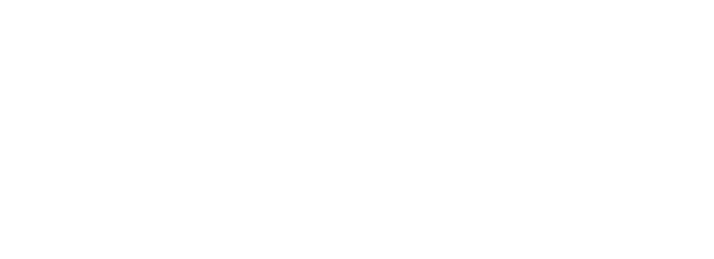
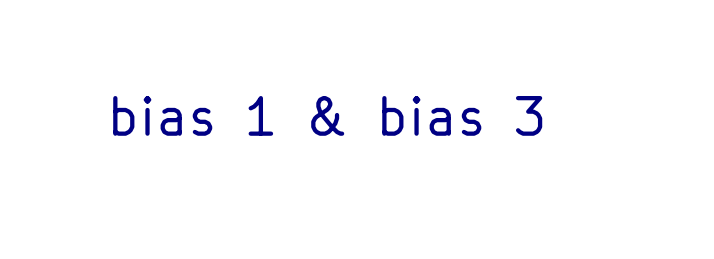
text: none -> bias 1 & bias 3 (327, 115)

